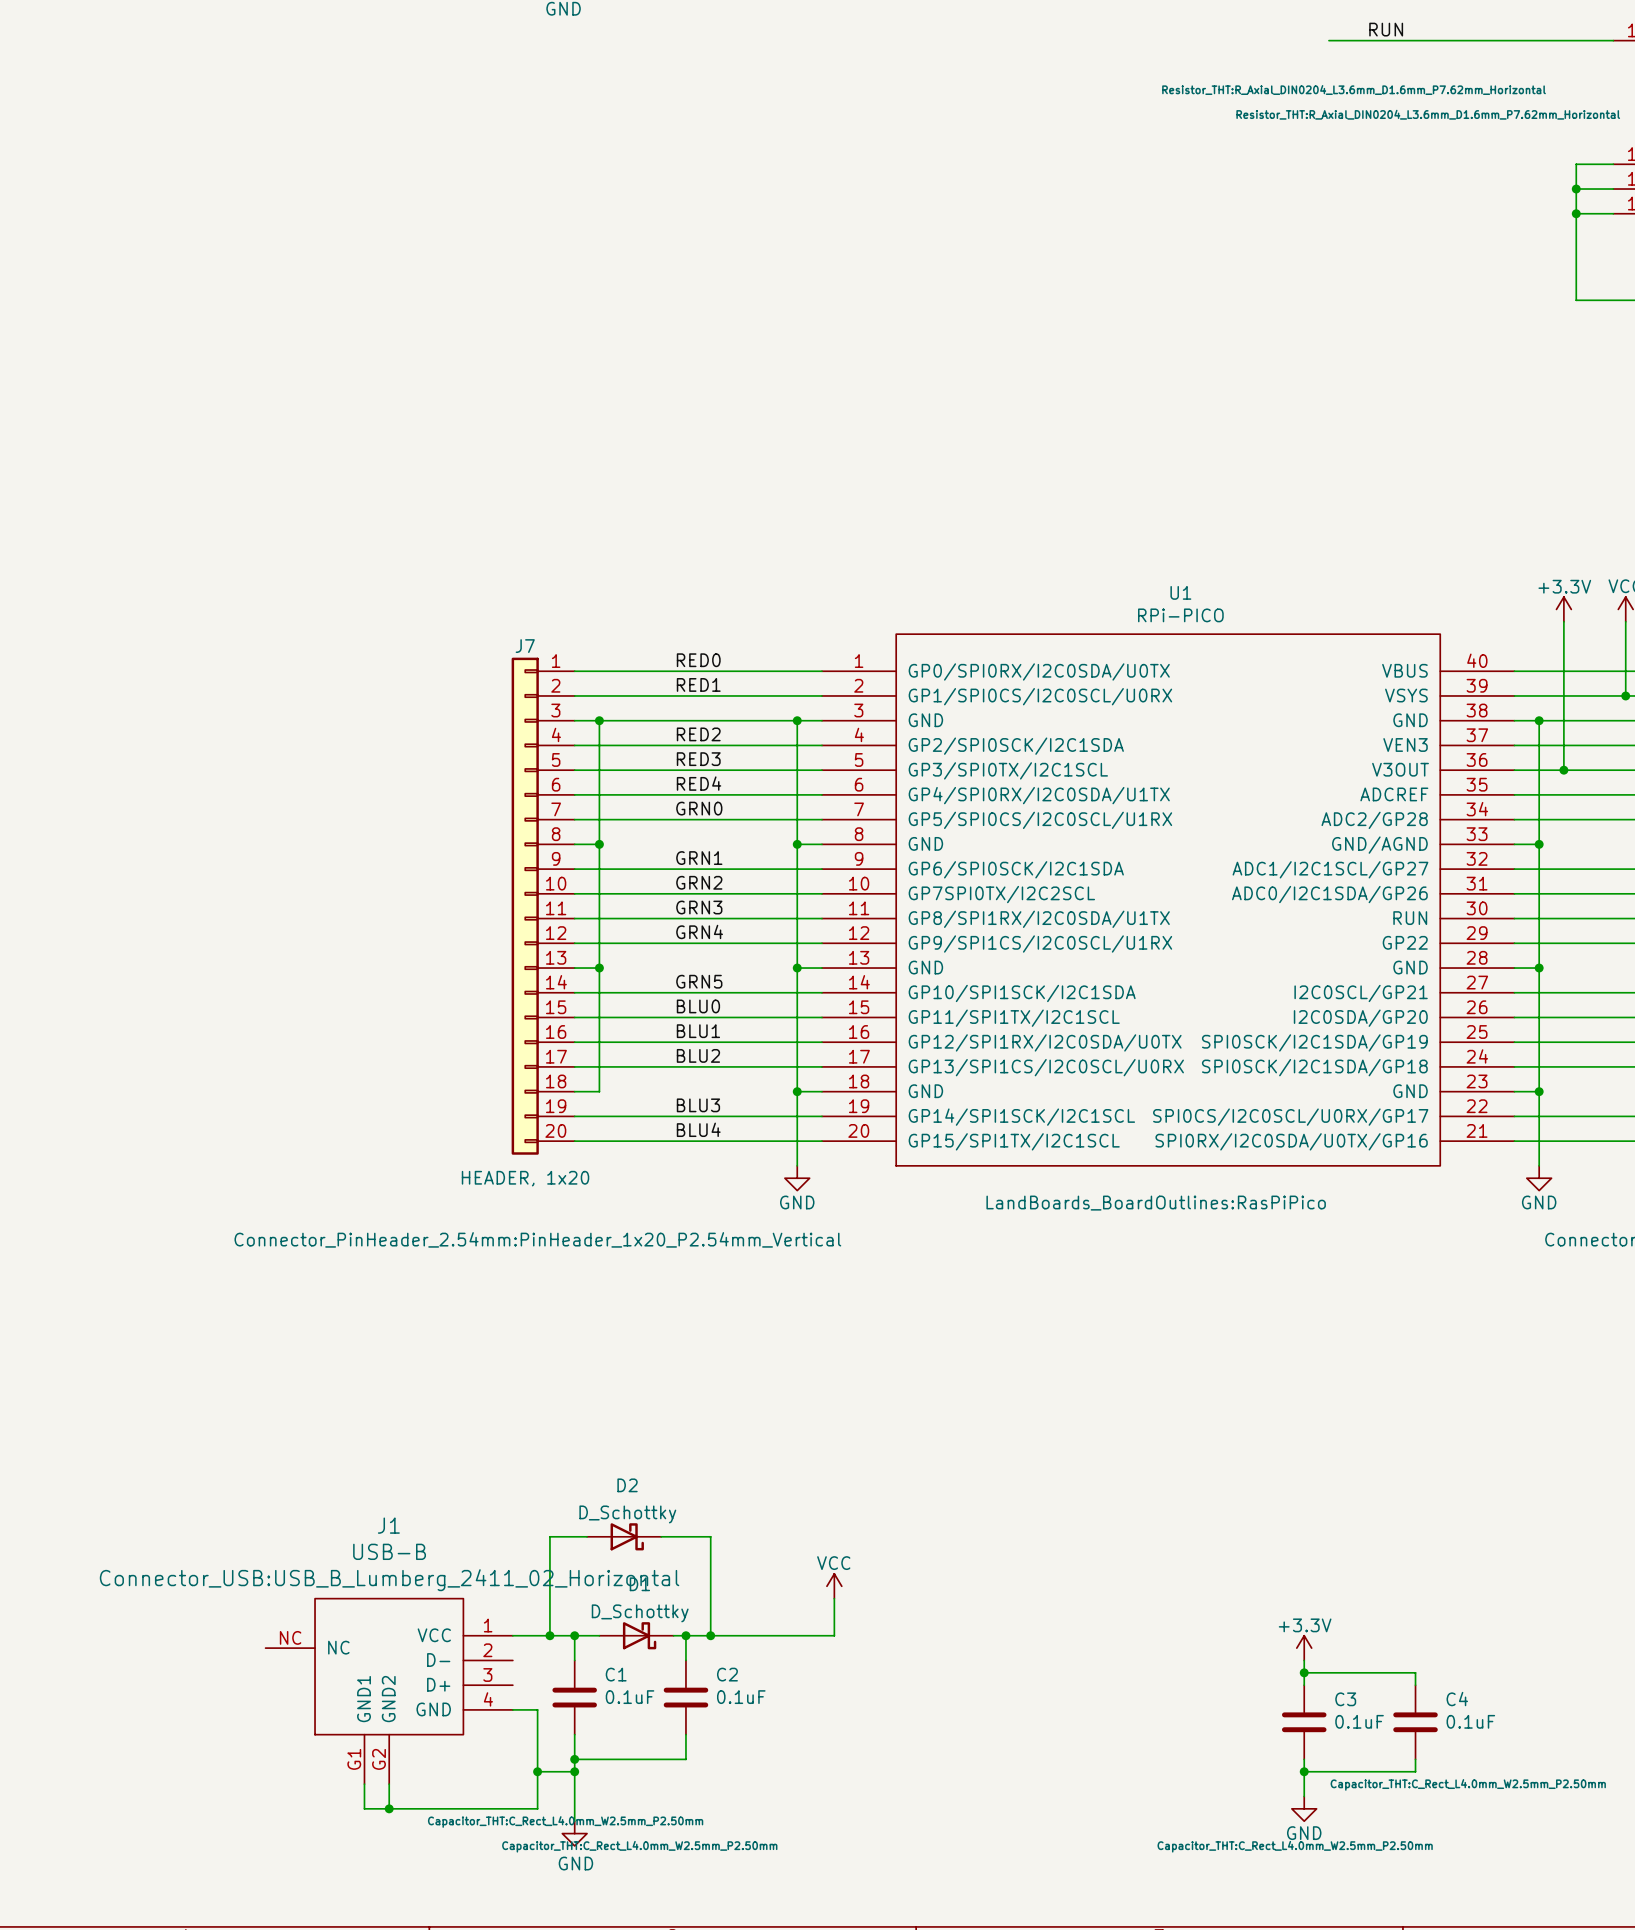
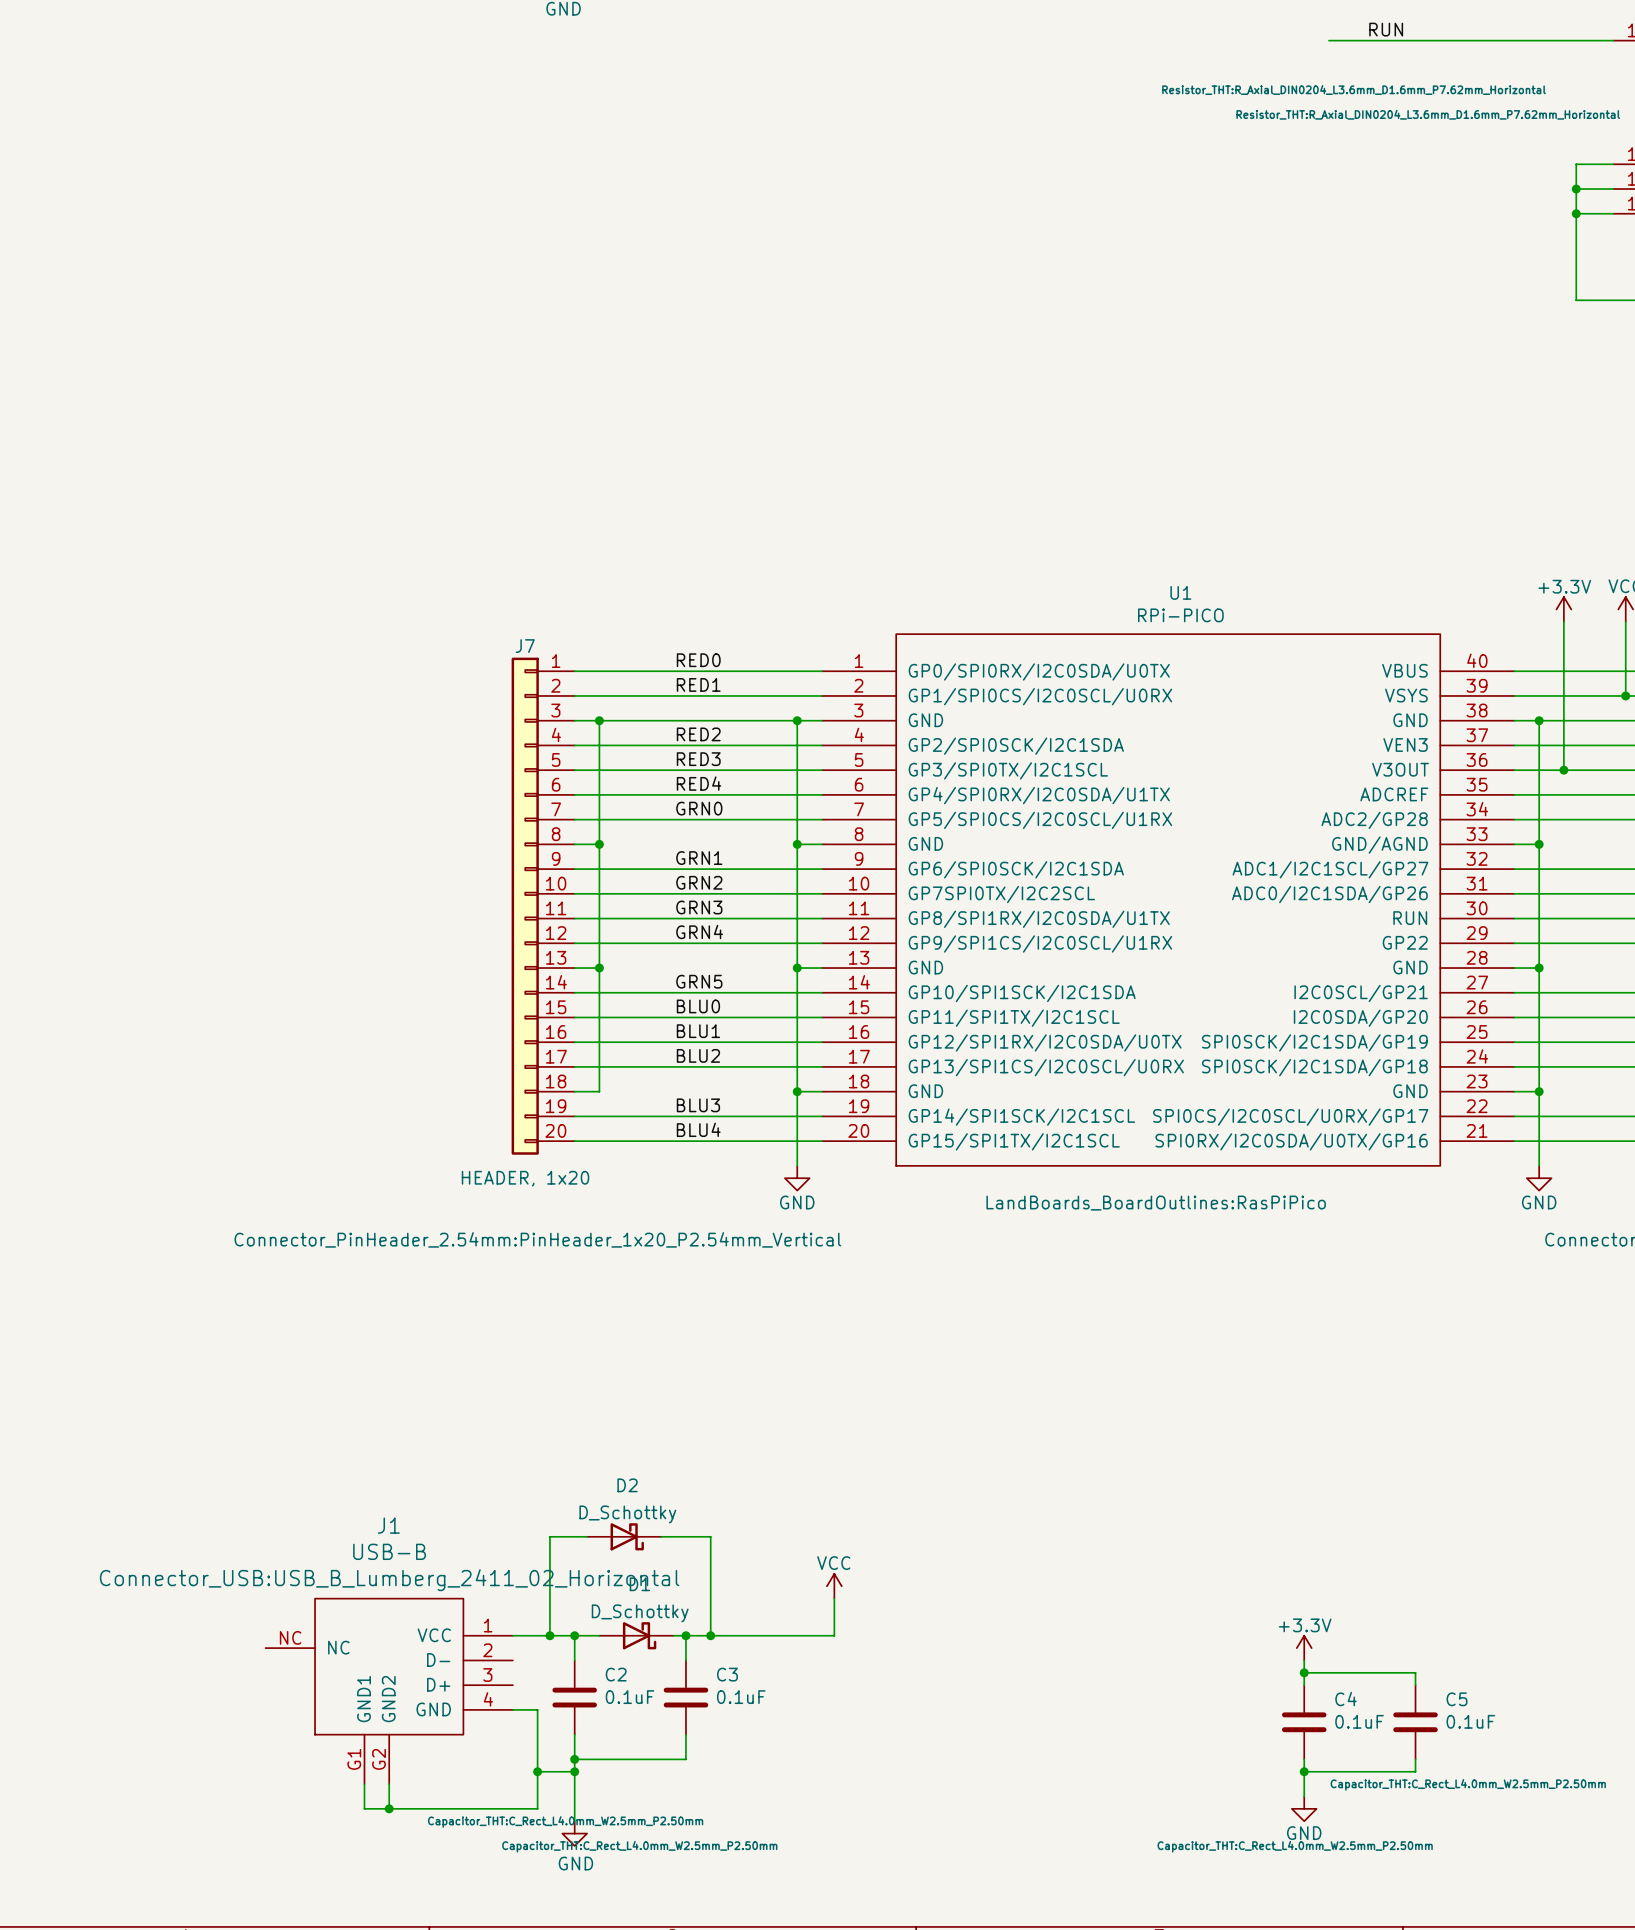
C1 name: C1 (616, 1674) -> C2 (616, 1674)
C2 name: C2 (727, 1674) -> C3 (727, 1674)
C3 name: C3 (1345, 1699) -> C4 (1346, 1699)
C4 name: C4 (1457, 1699) -> C5 (1457, 1699)

